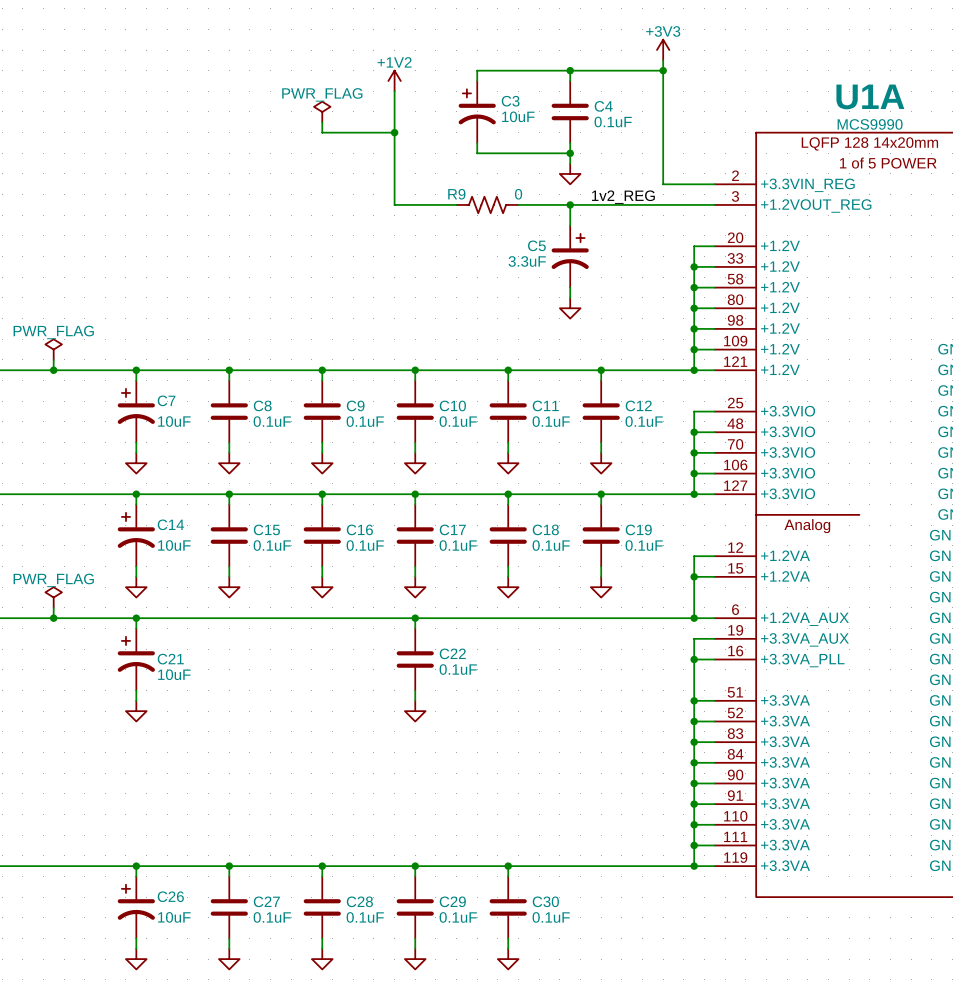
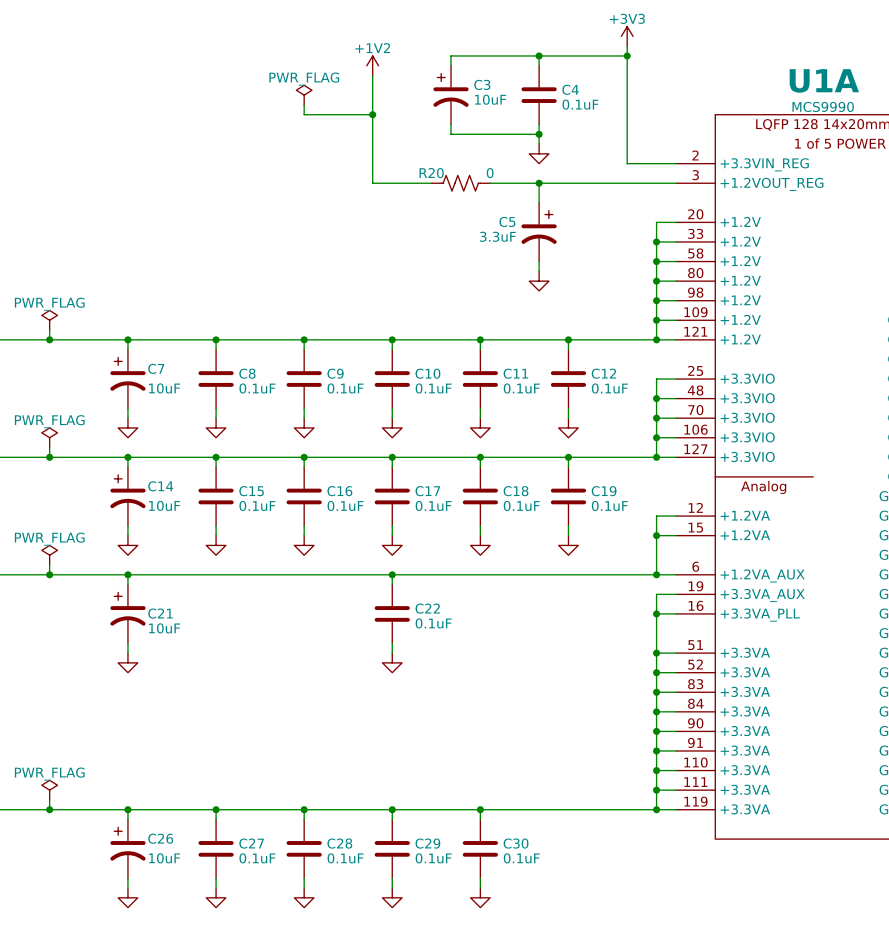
R9 name: R9 (456, 194) -> R20 (431, 173)
label: 1v2_REG (623, 197) -> none
power symbol: none -> PWR_FLAG (49, 437)
wire: none -> (49, 447) (49, 457)
junction: none -> (49, 457)
power symbol: none -> PWR_FLAG (49, 790)
wire: none -> (49, 799) (49, 809)
junction: none -> (49, 809)

